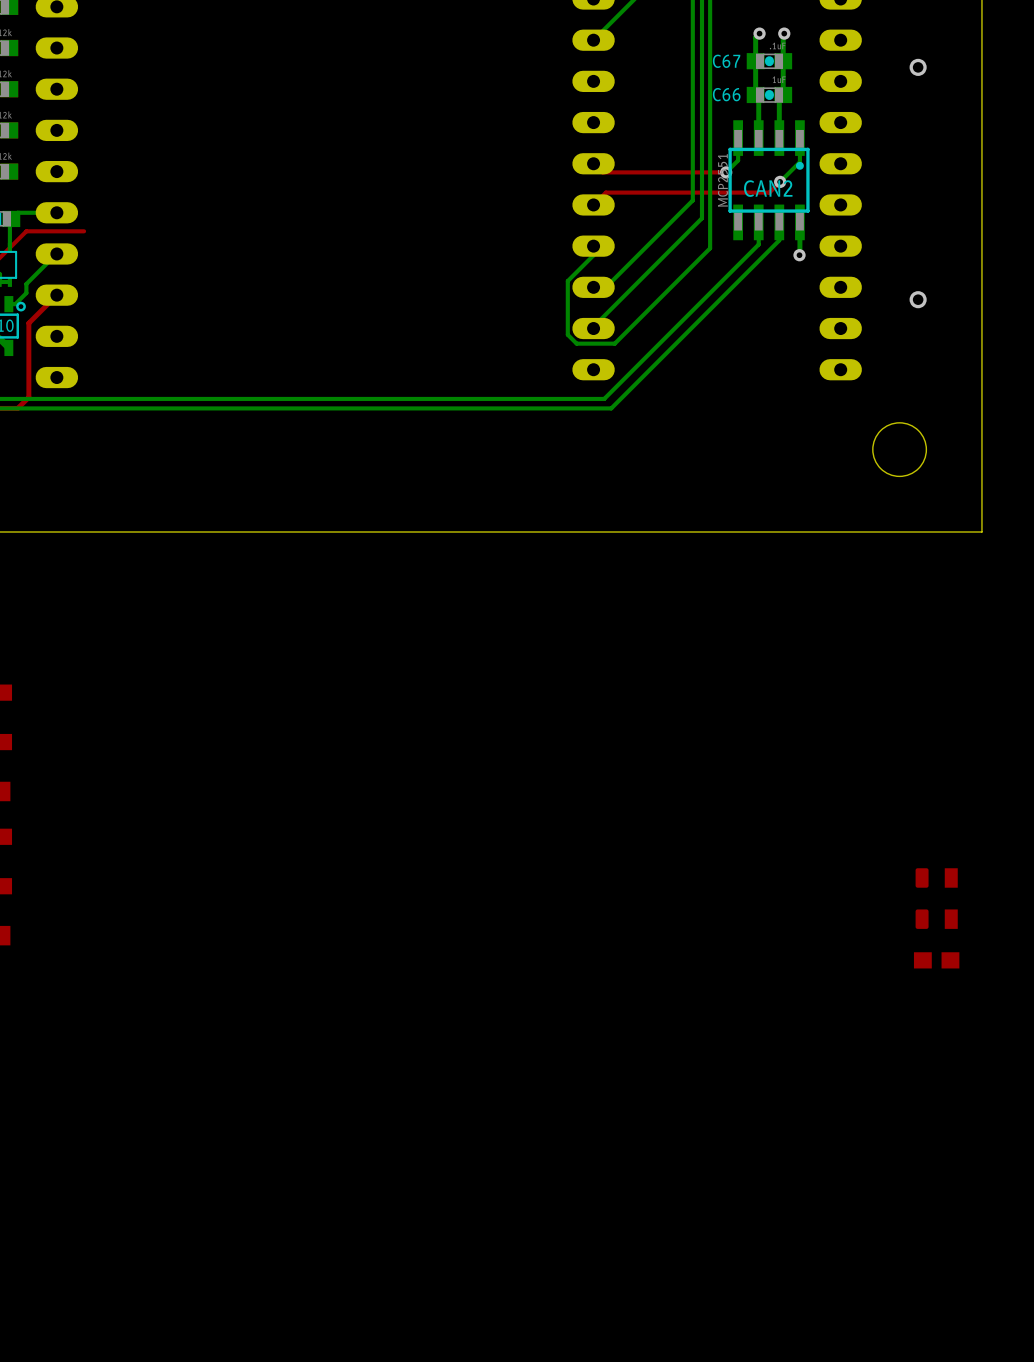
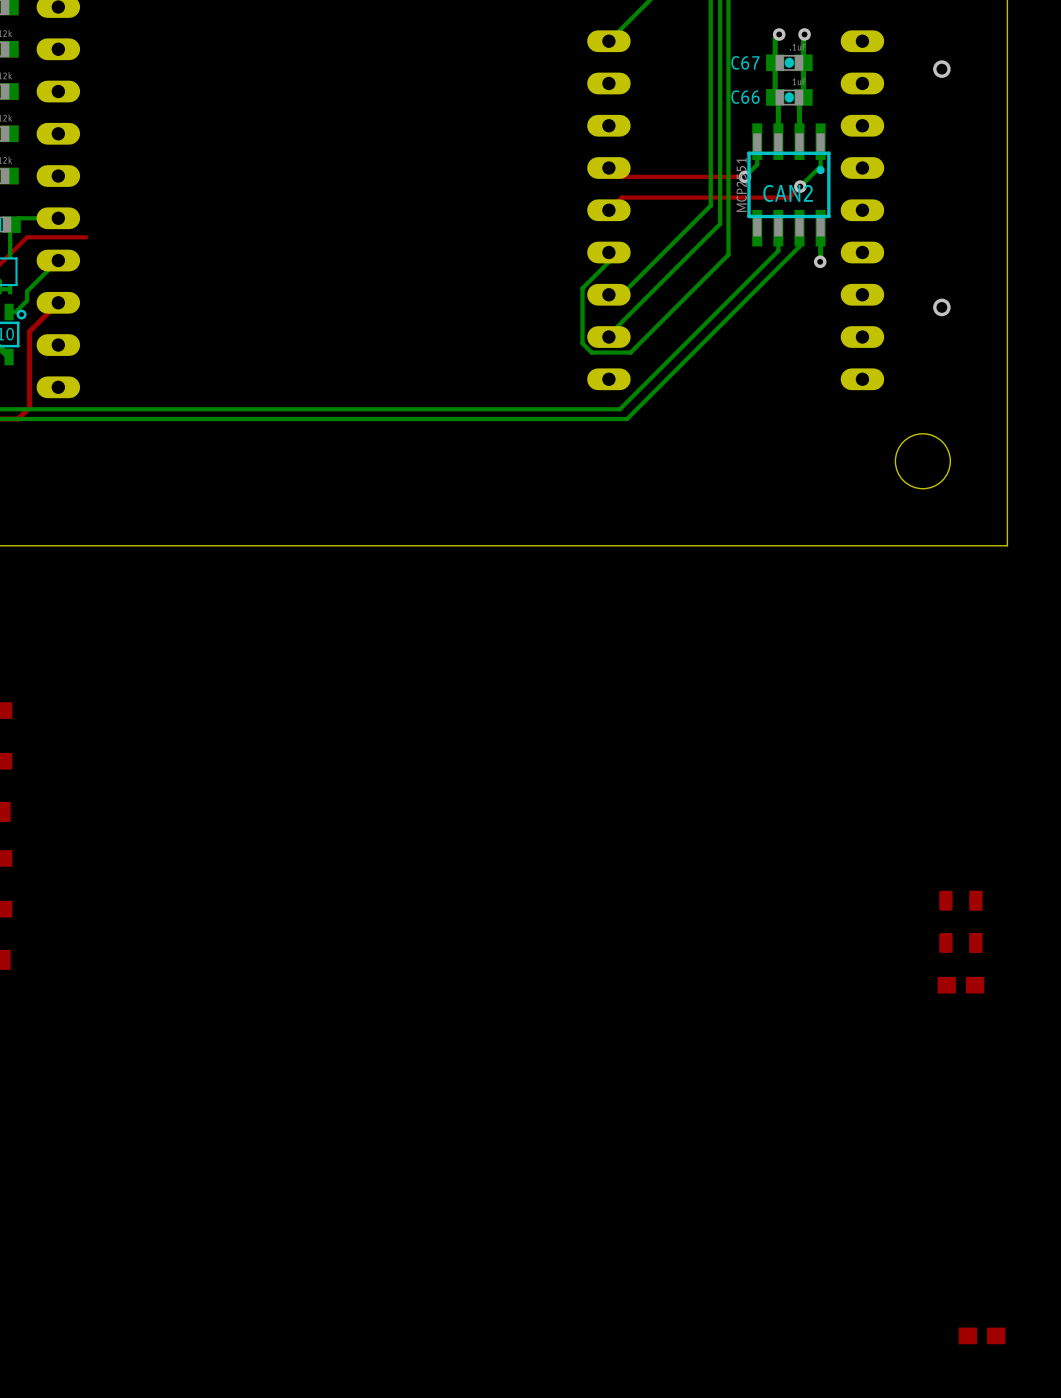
part: none -> (982, 1335)

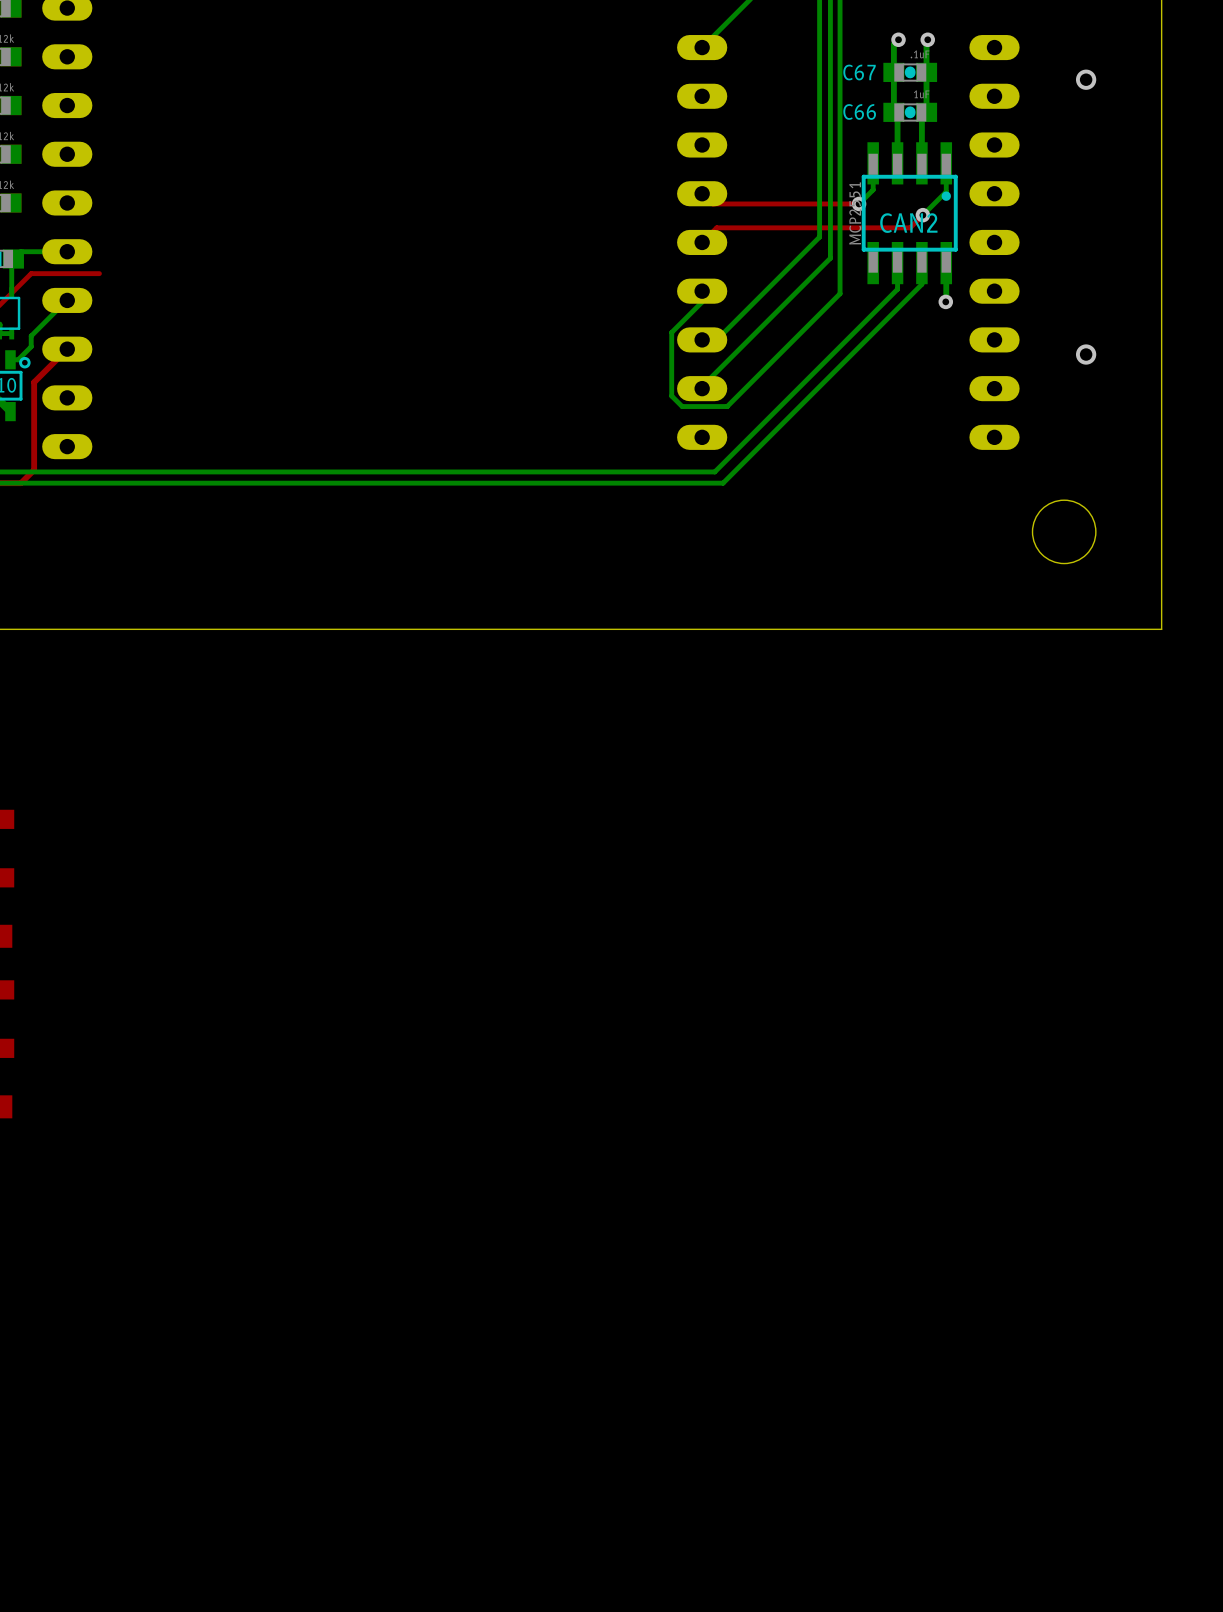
part: (960, 900) -> none
part: (960, 942) -> none
part: (960, 985) -> none
part: (982, 1335) -> none

